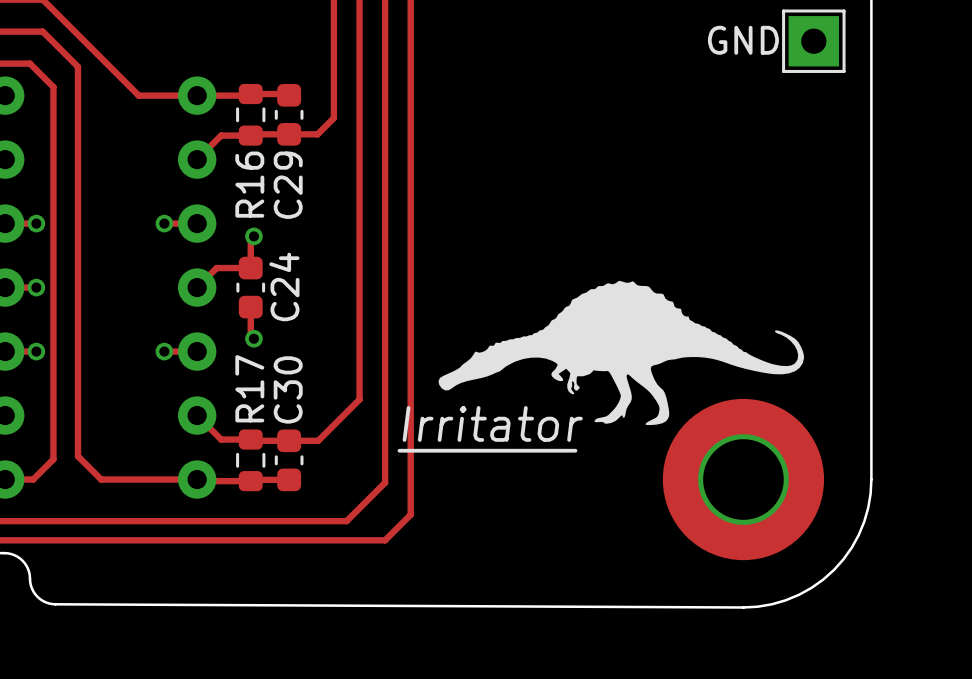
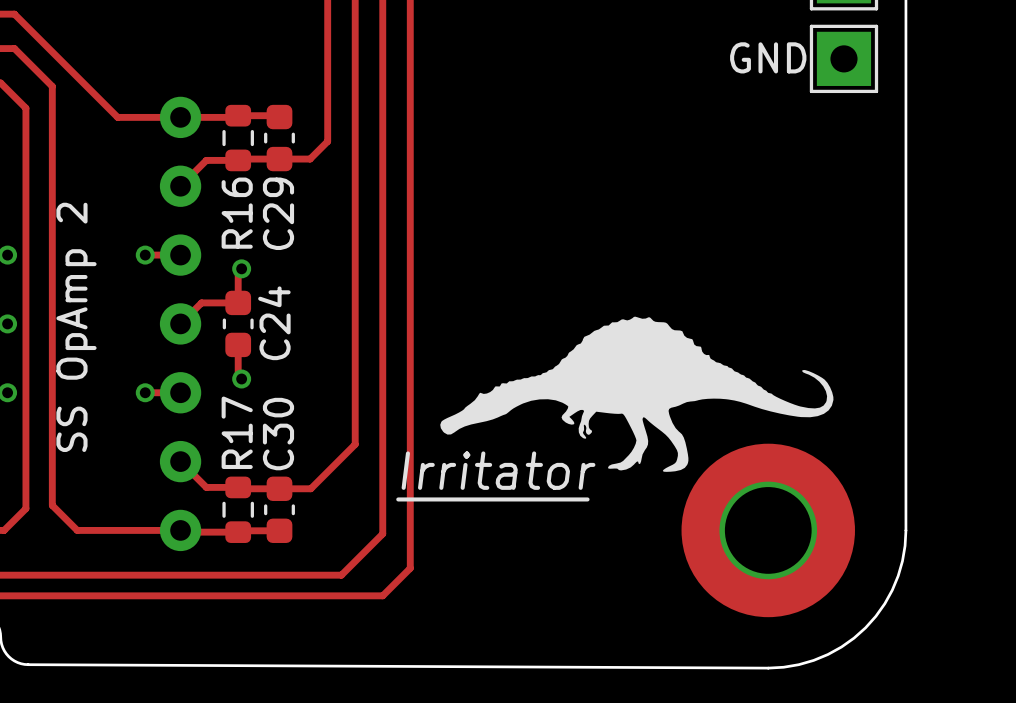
drawing: none -> [440, 316, 834, 472]
text: none -> SS OpAmp 2 (76, 327)
part: (621, 352) -> none

